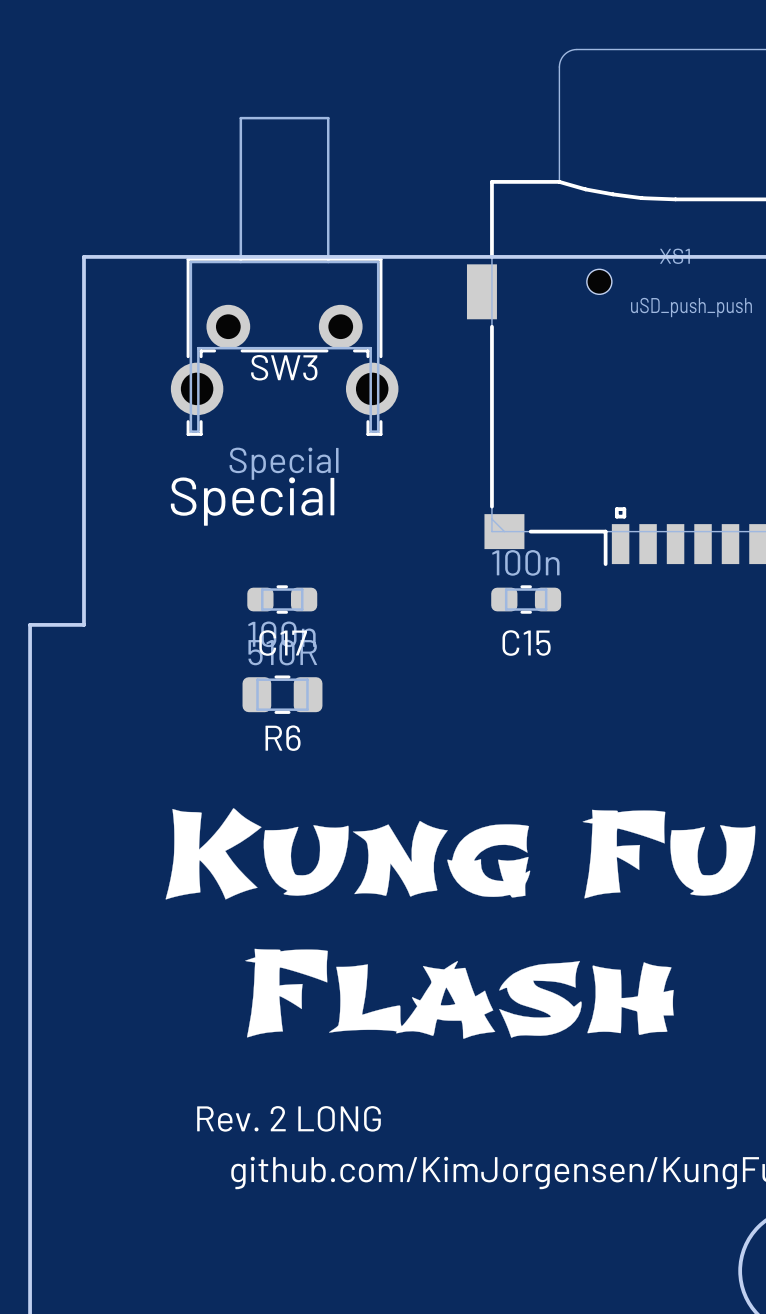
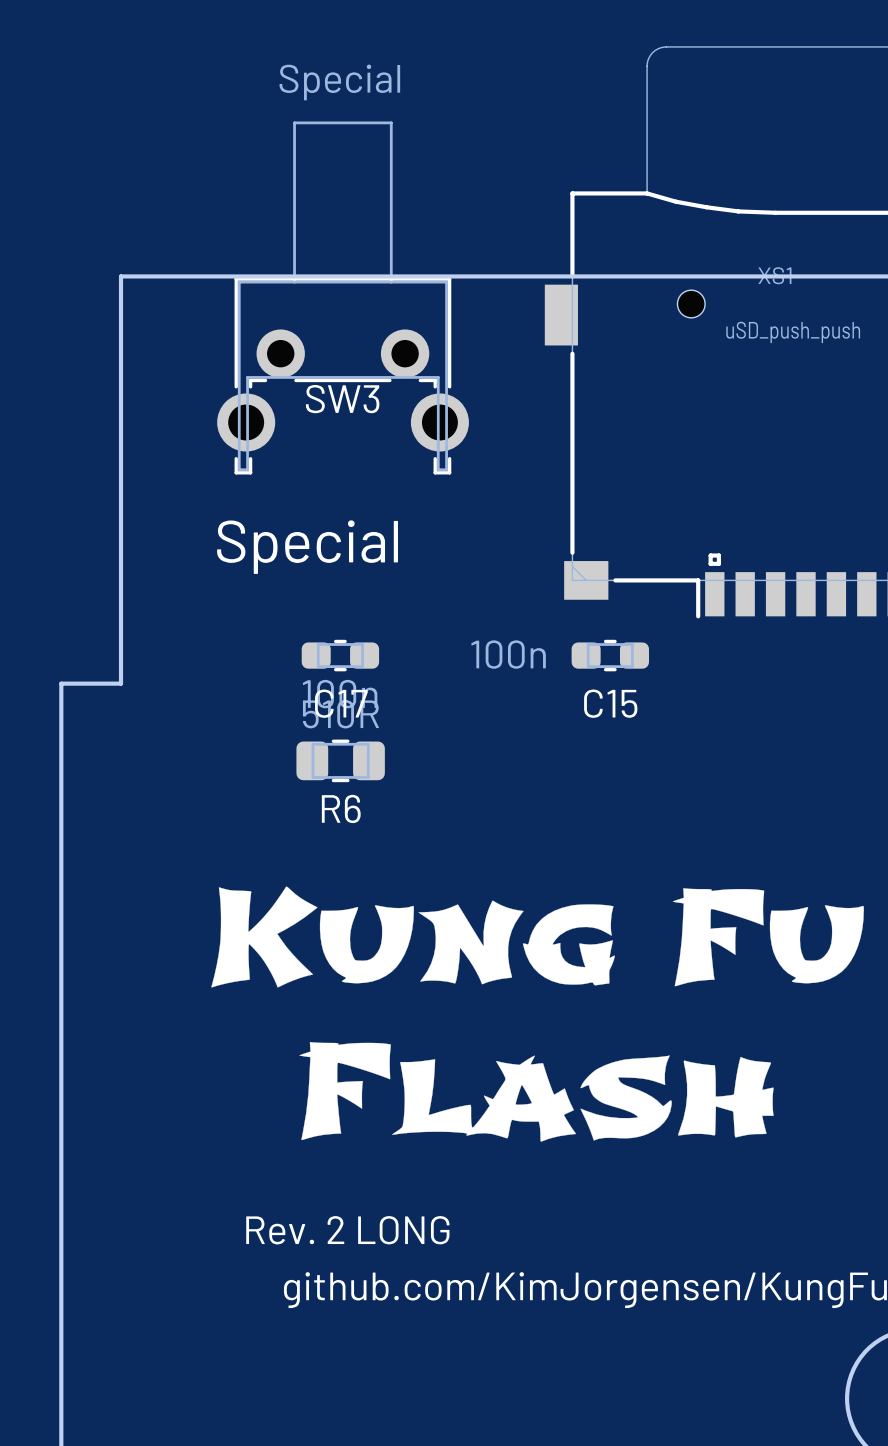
SW3 value position: Special (284, 463) -> Special (339, 82)
C15 value position: 100n (525, 562) -> 100n (508, 654)

